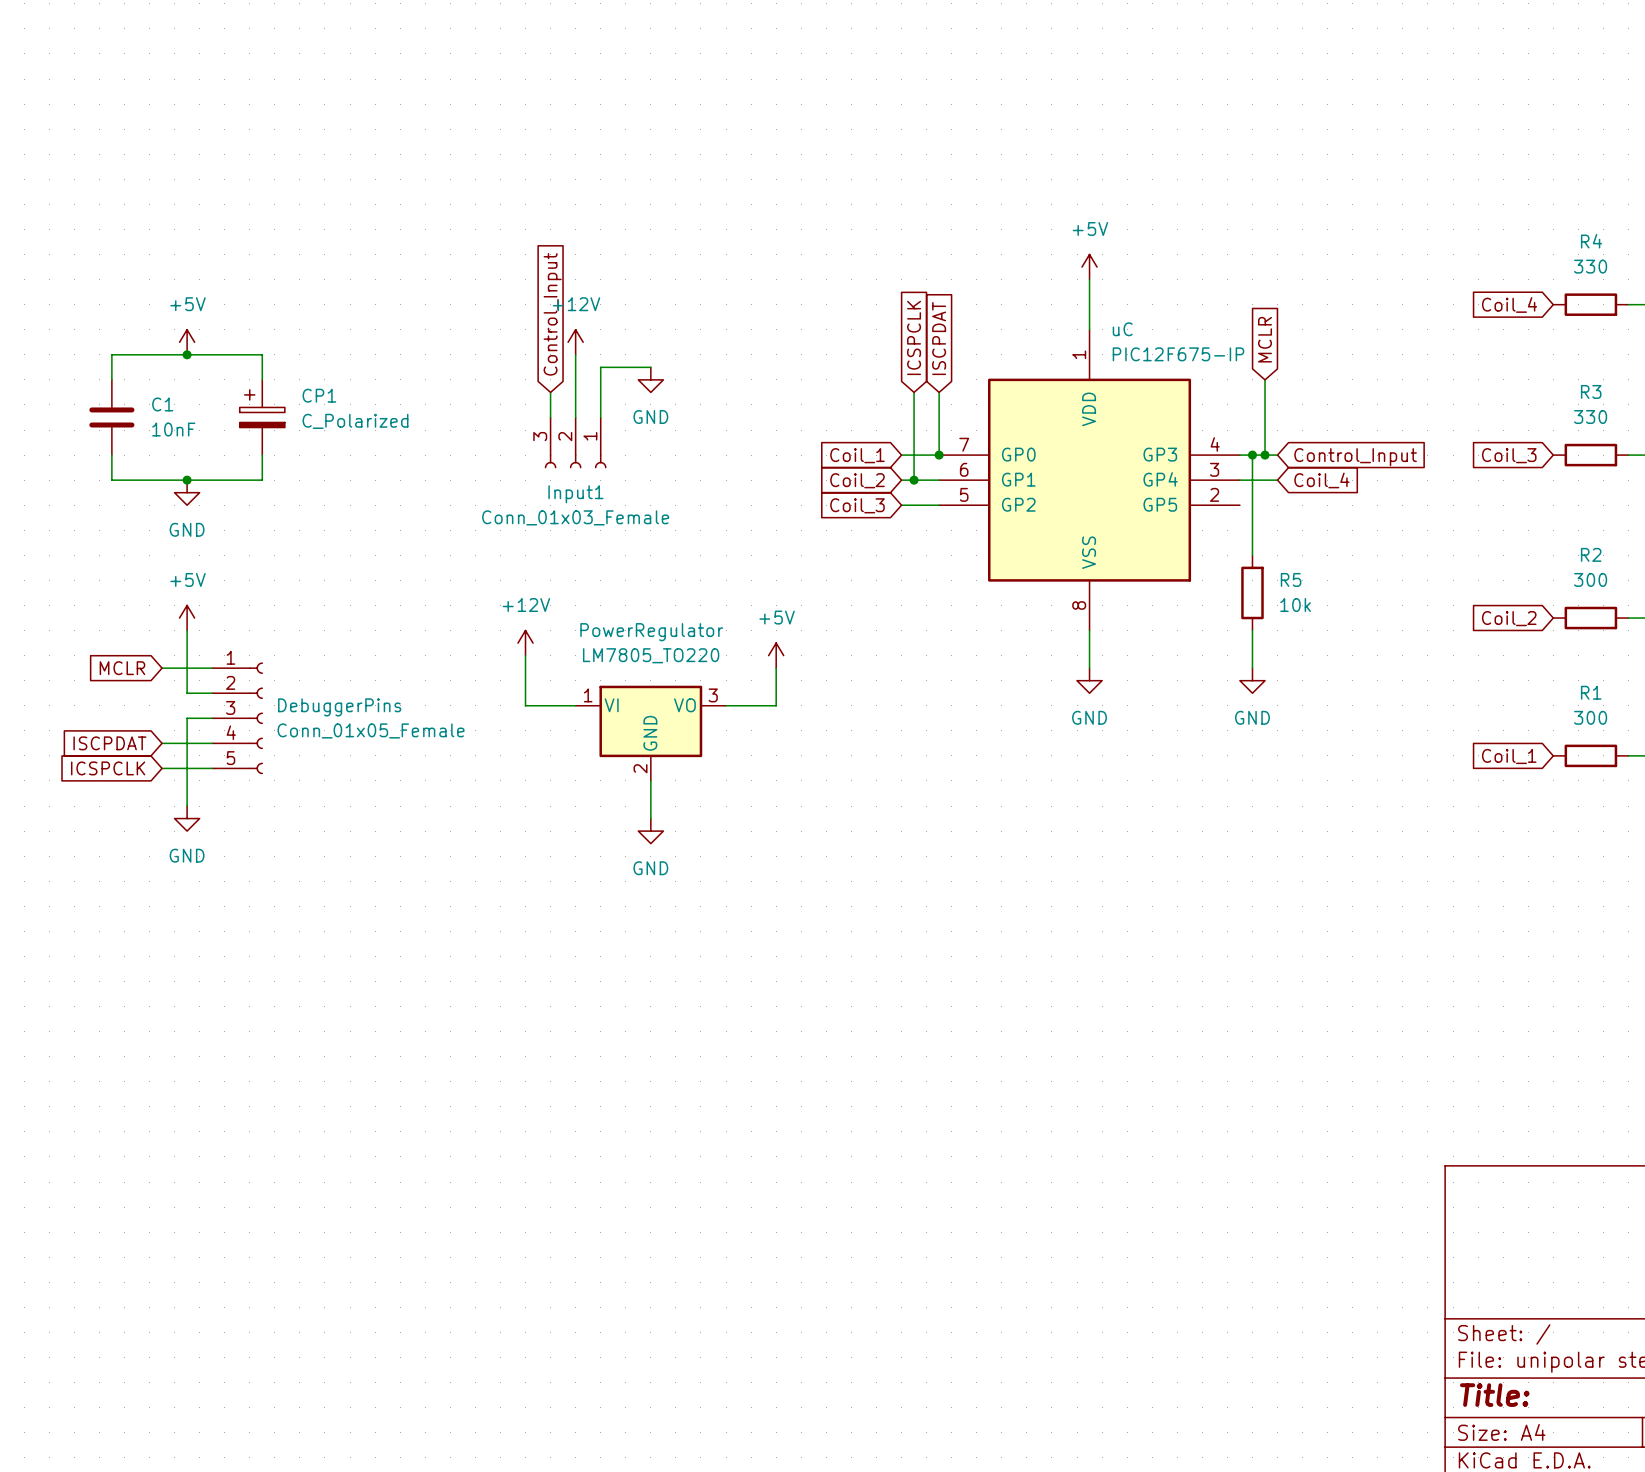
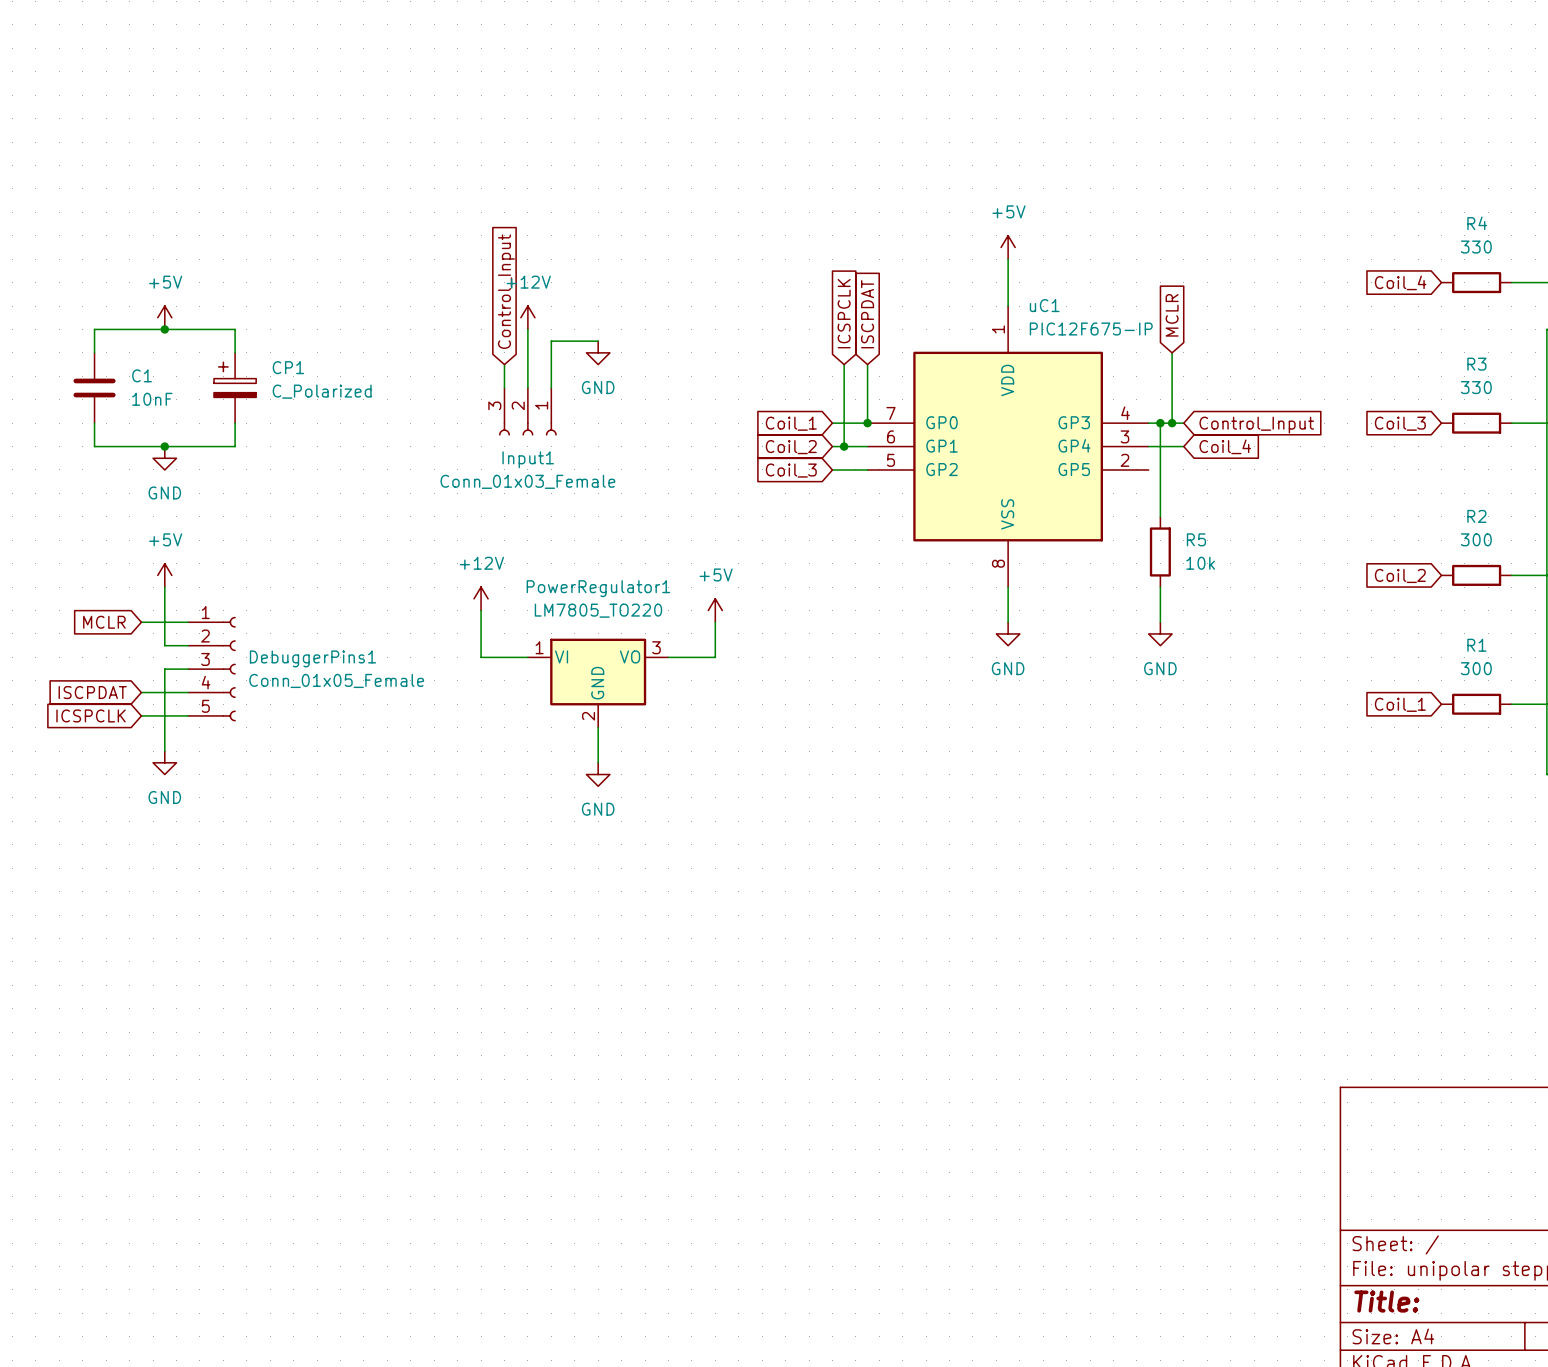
uC name: uC (1122, 329) -> uC1 (1044, 305)
PowerRegulator name: PowerRegulator (651, 632) -> PowerRegulator1 (598, 588)
DebuggerPins name: DebuggerPins (339, 707) -> DebuggerPins1 (312, 658)

